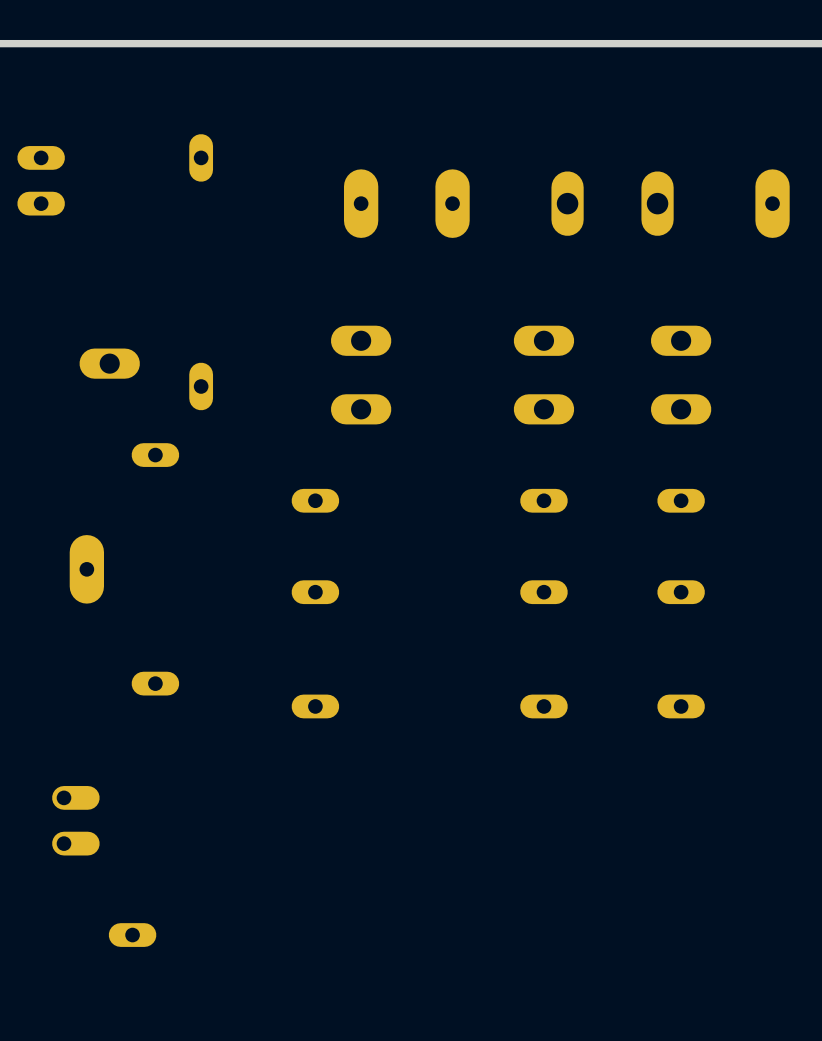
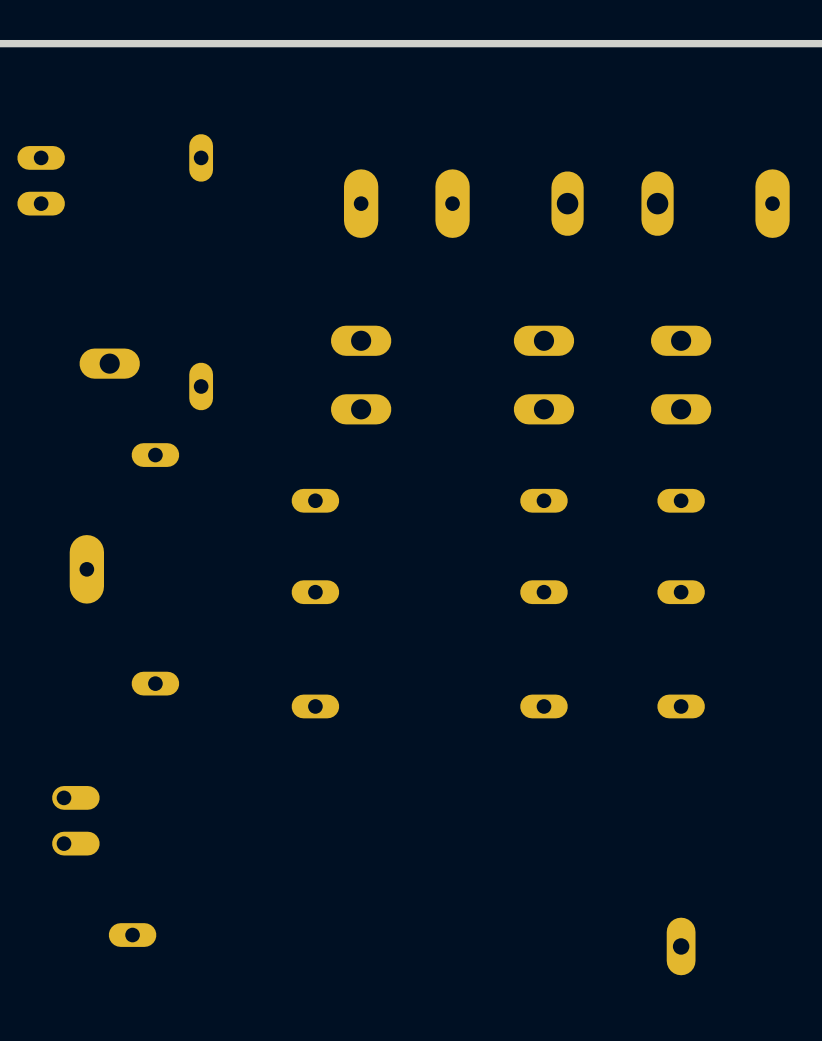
part: none -> (681, 946)

